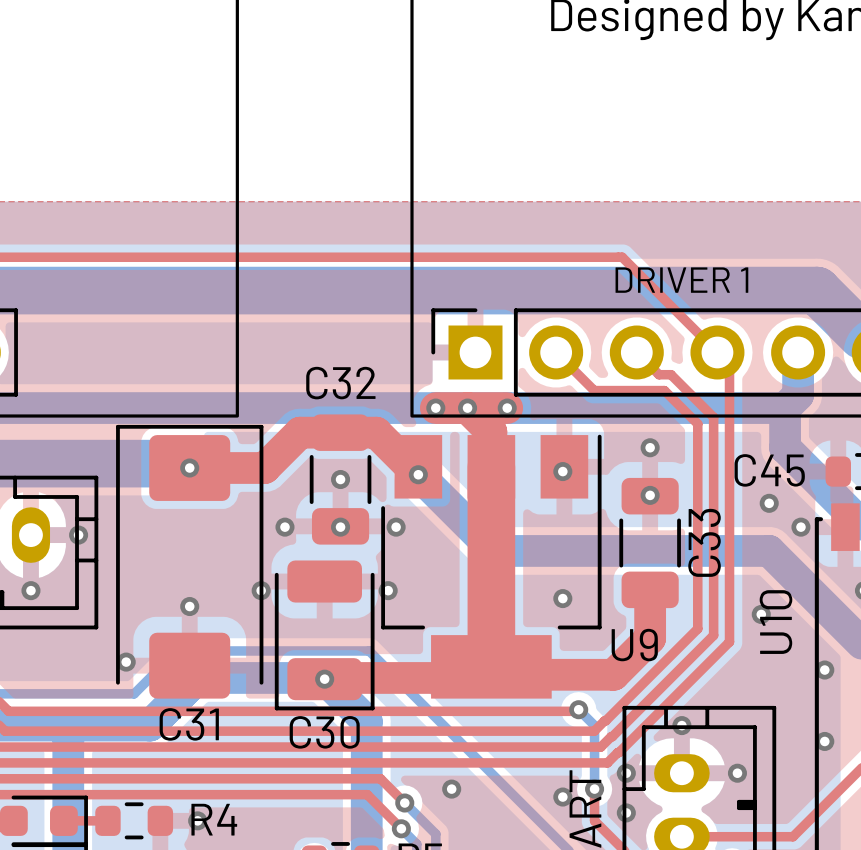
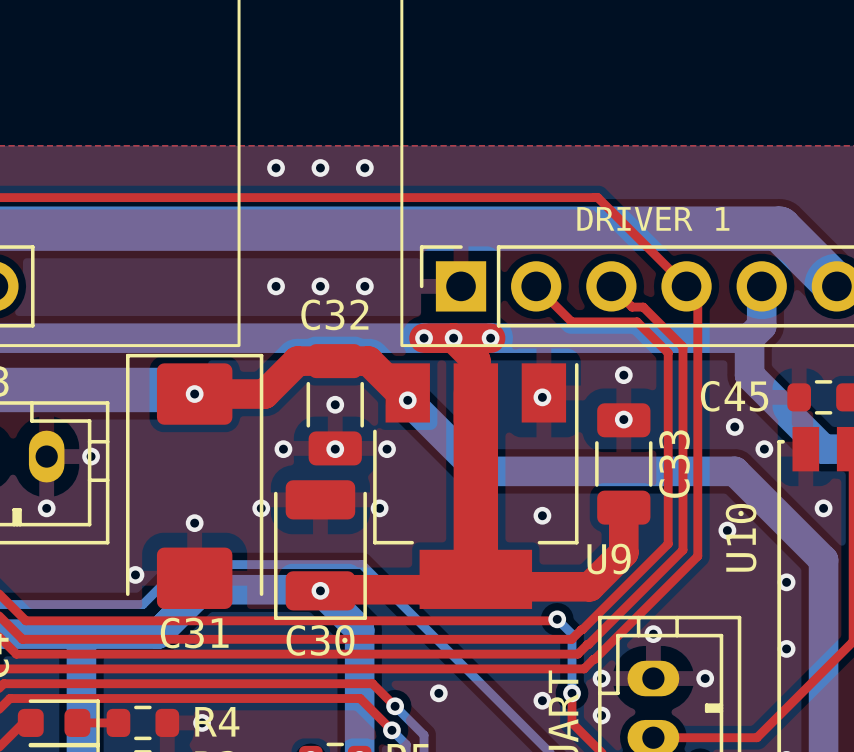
via: none -> (276, 168)
via: none -> (320, 168)
via: none -> (364, 168)
via: none -> (276, 286)
via: none -> (320, 286)
via: none -> (364, 286)

